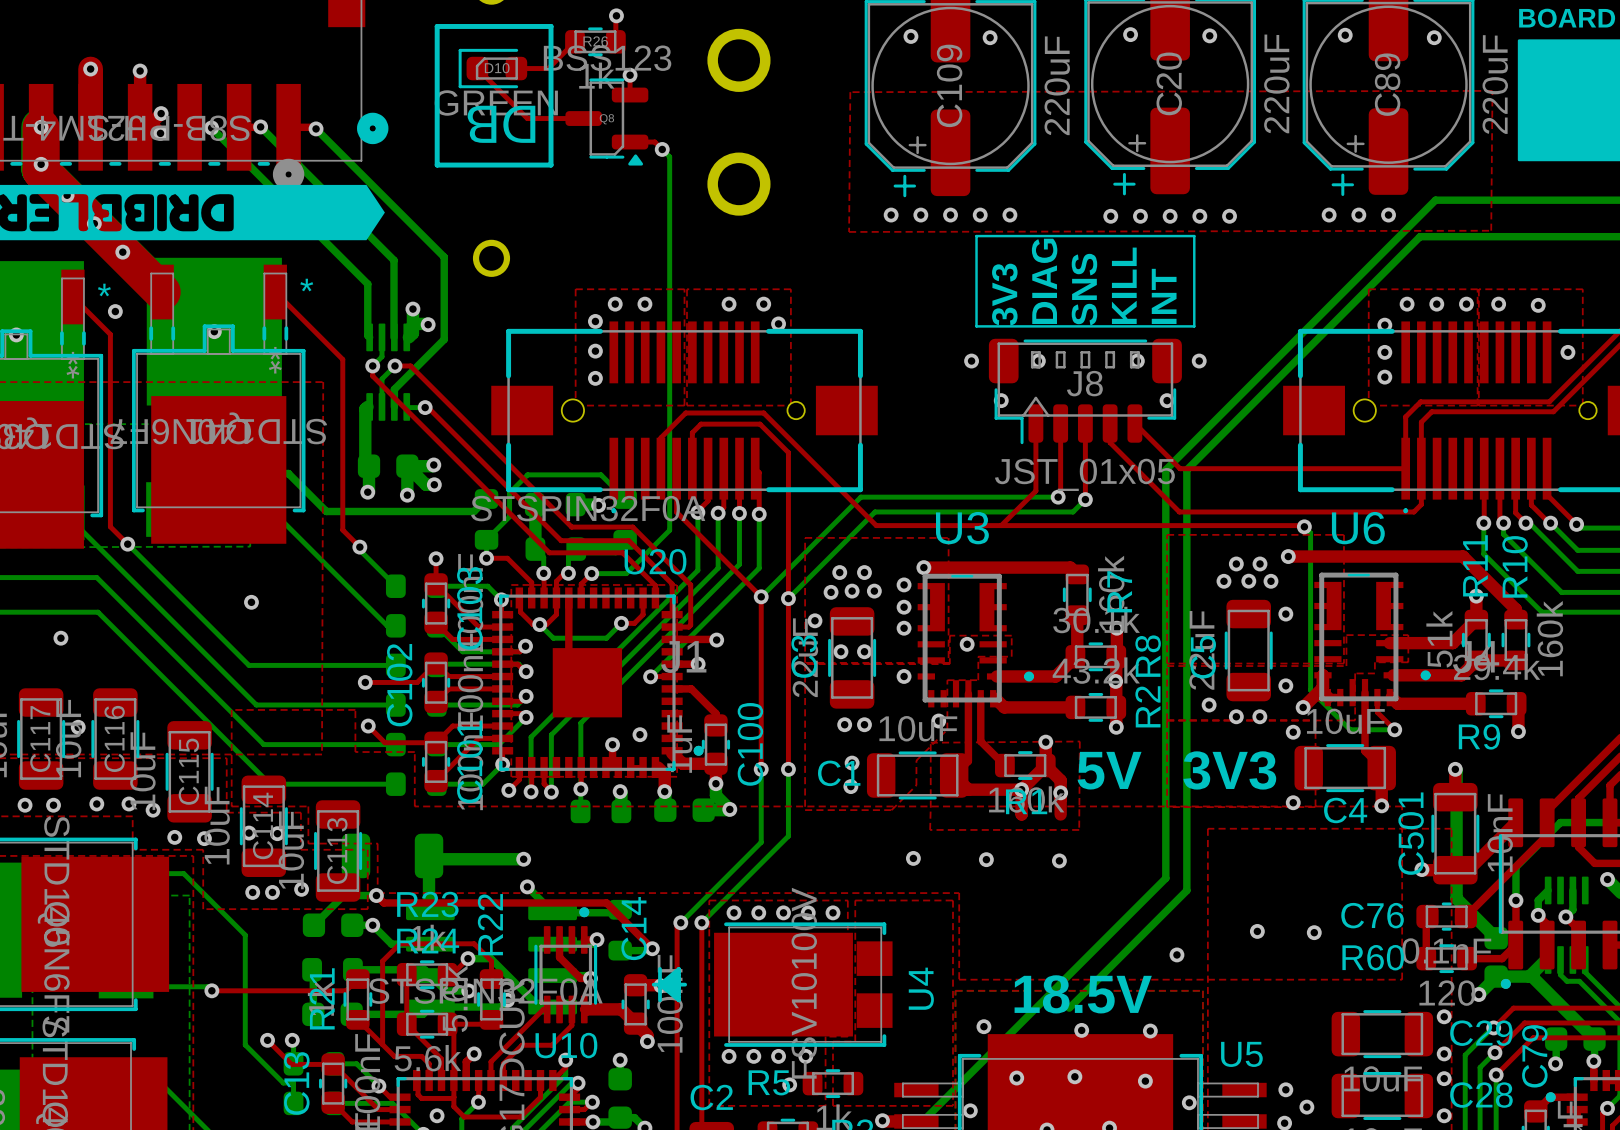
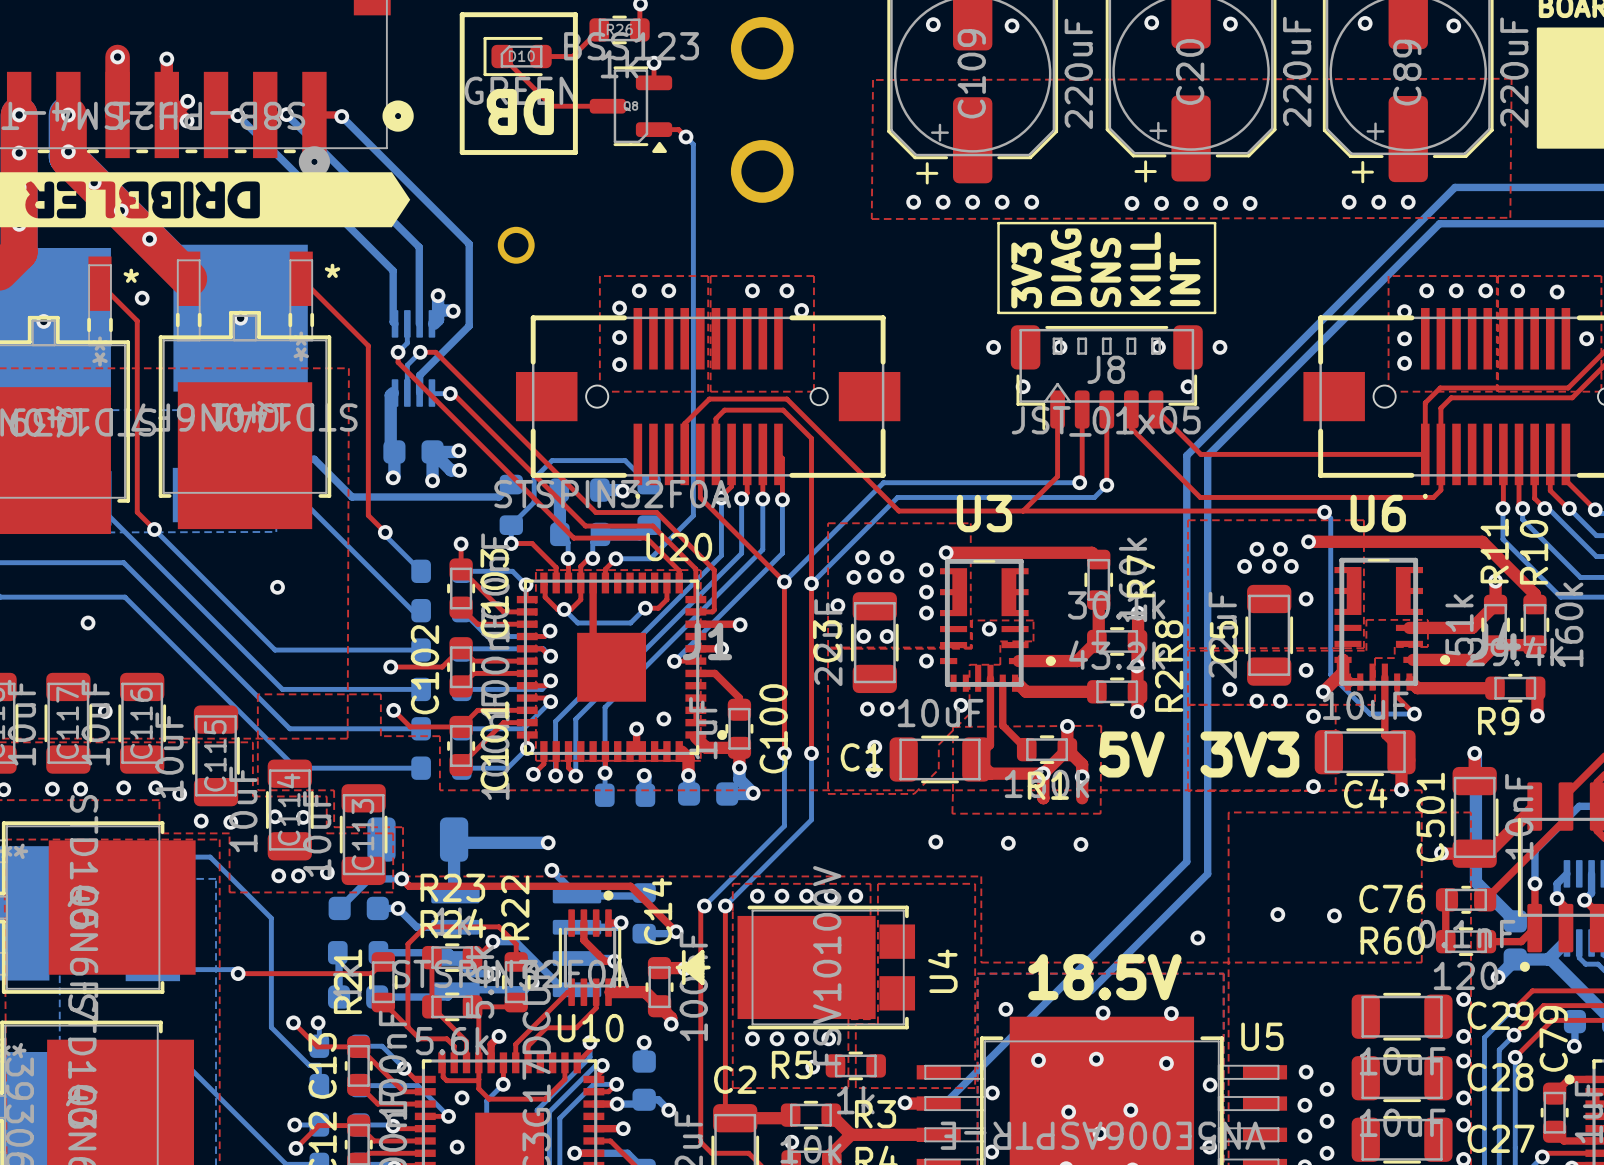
J8 value position: JST_01x05 (1084, 474) -> JST_01x05 (1106, 421)

